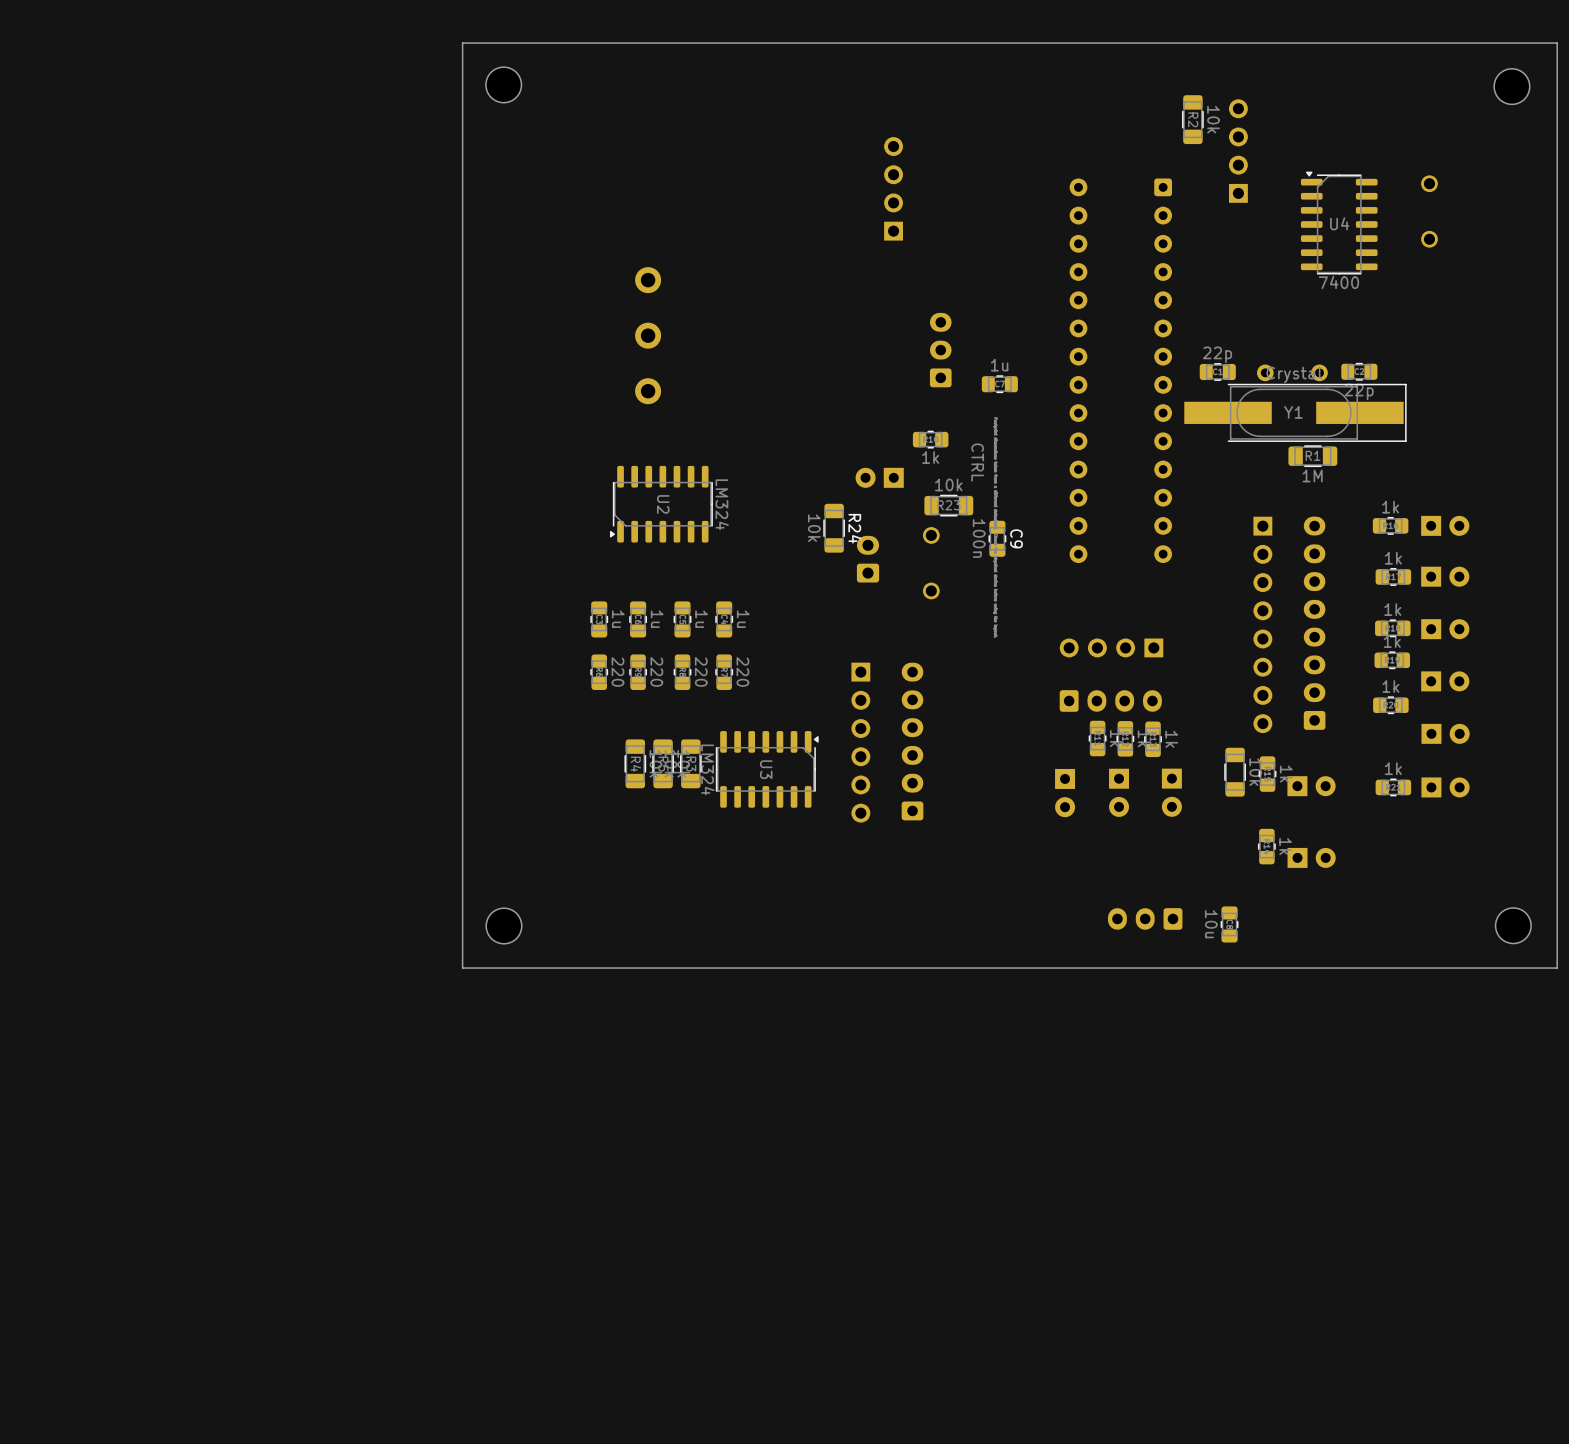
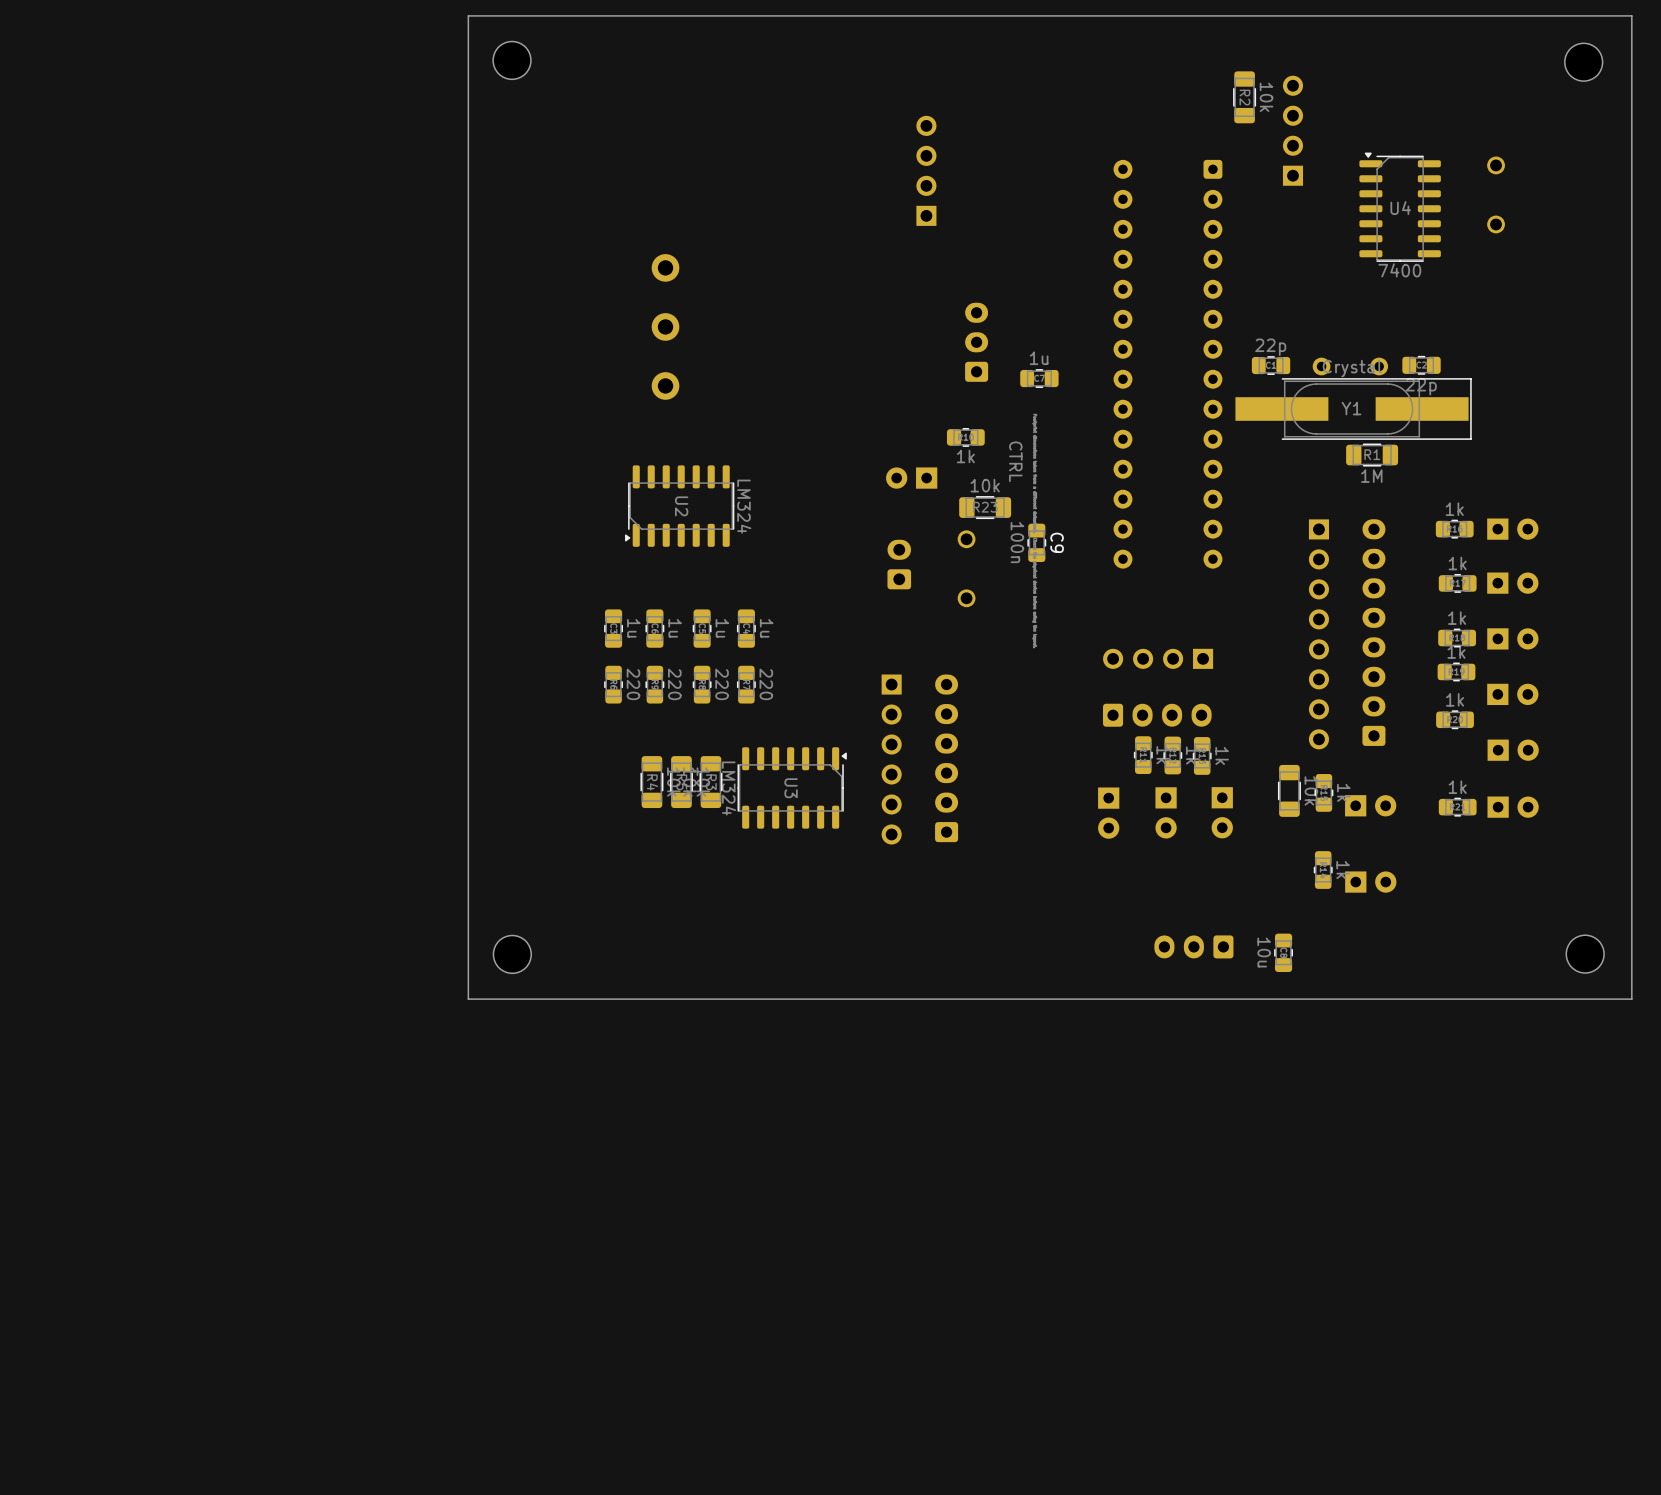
R24: 10k (834, 528) -> none

